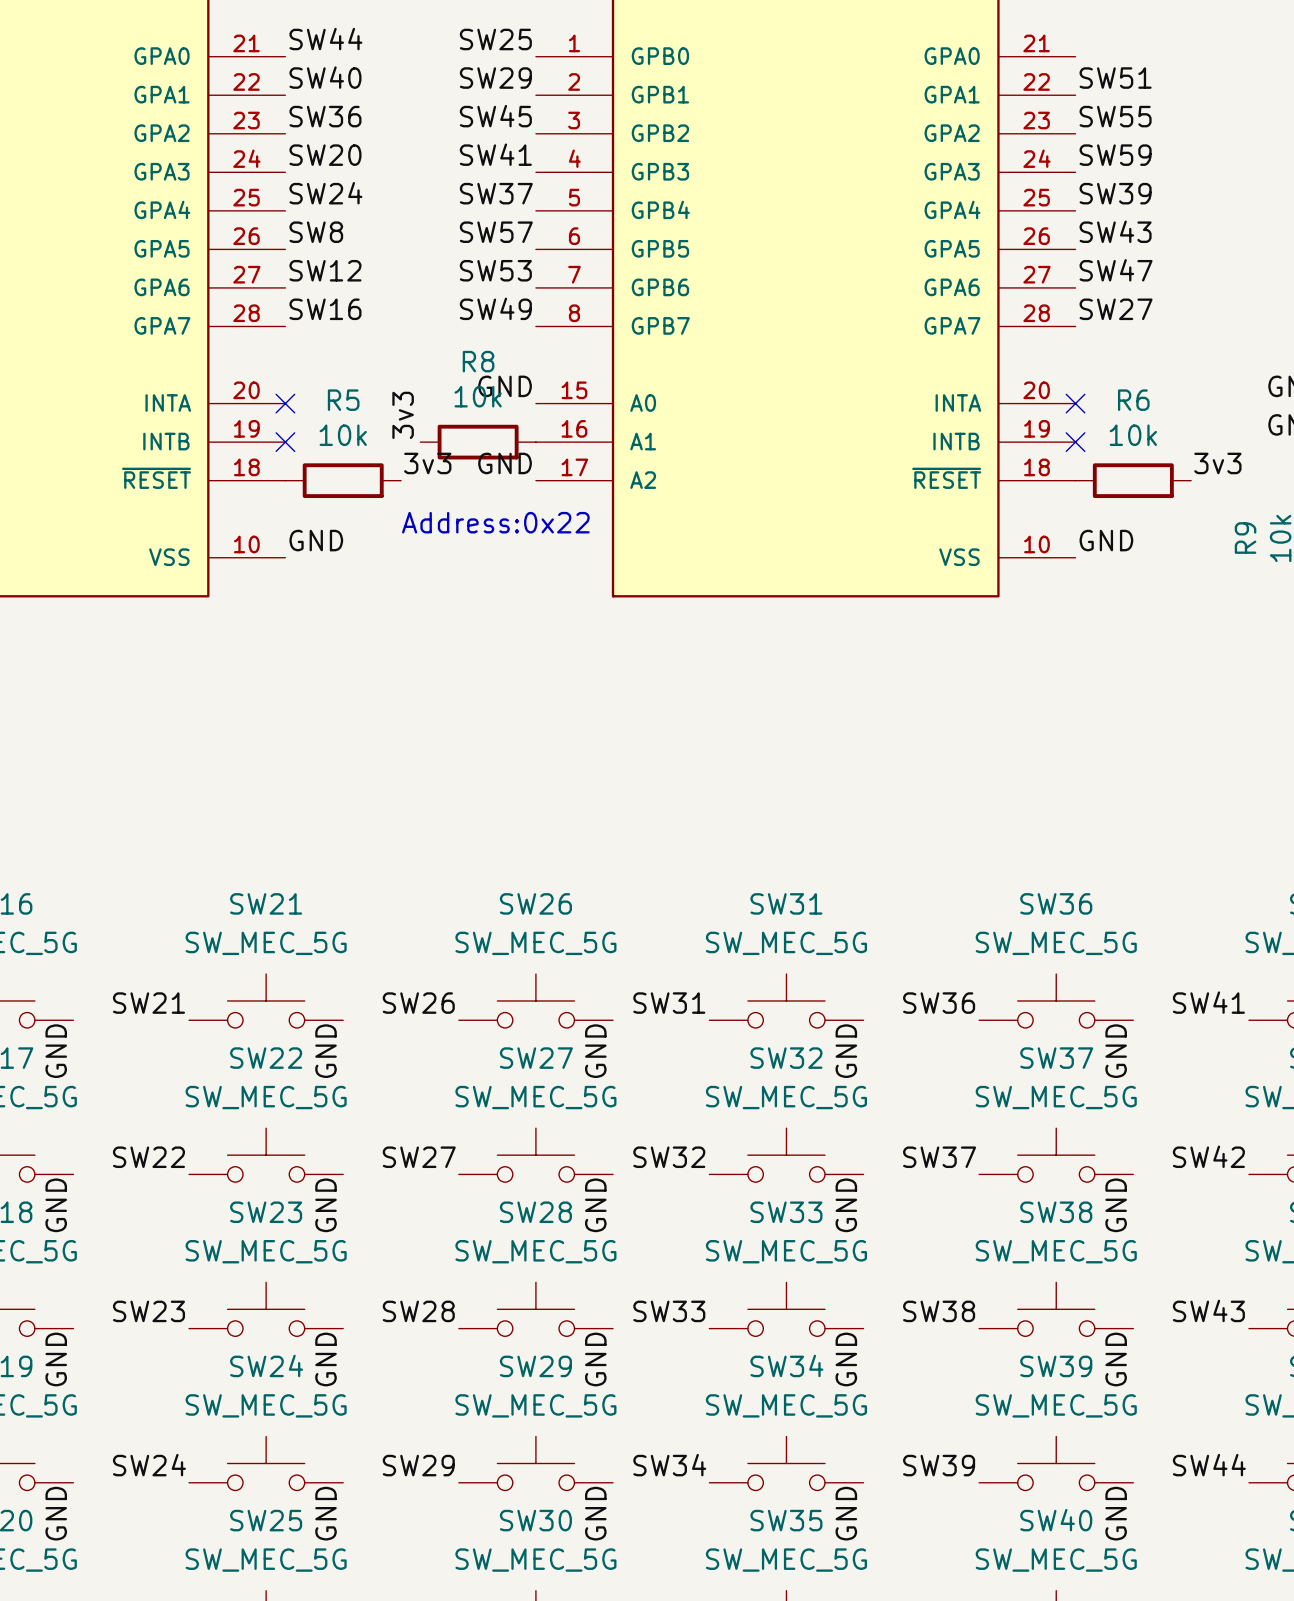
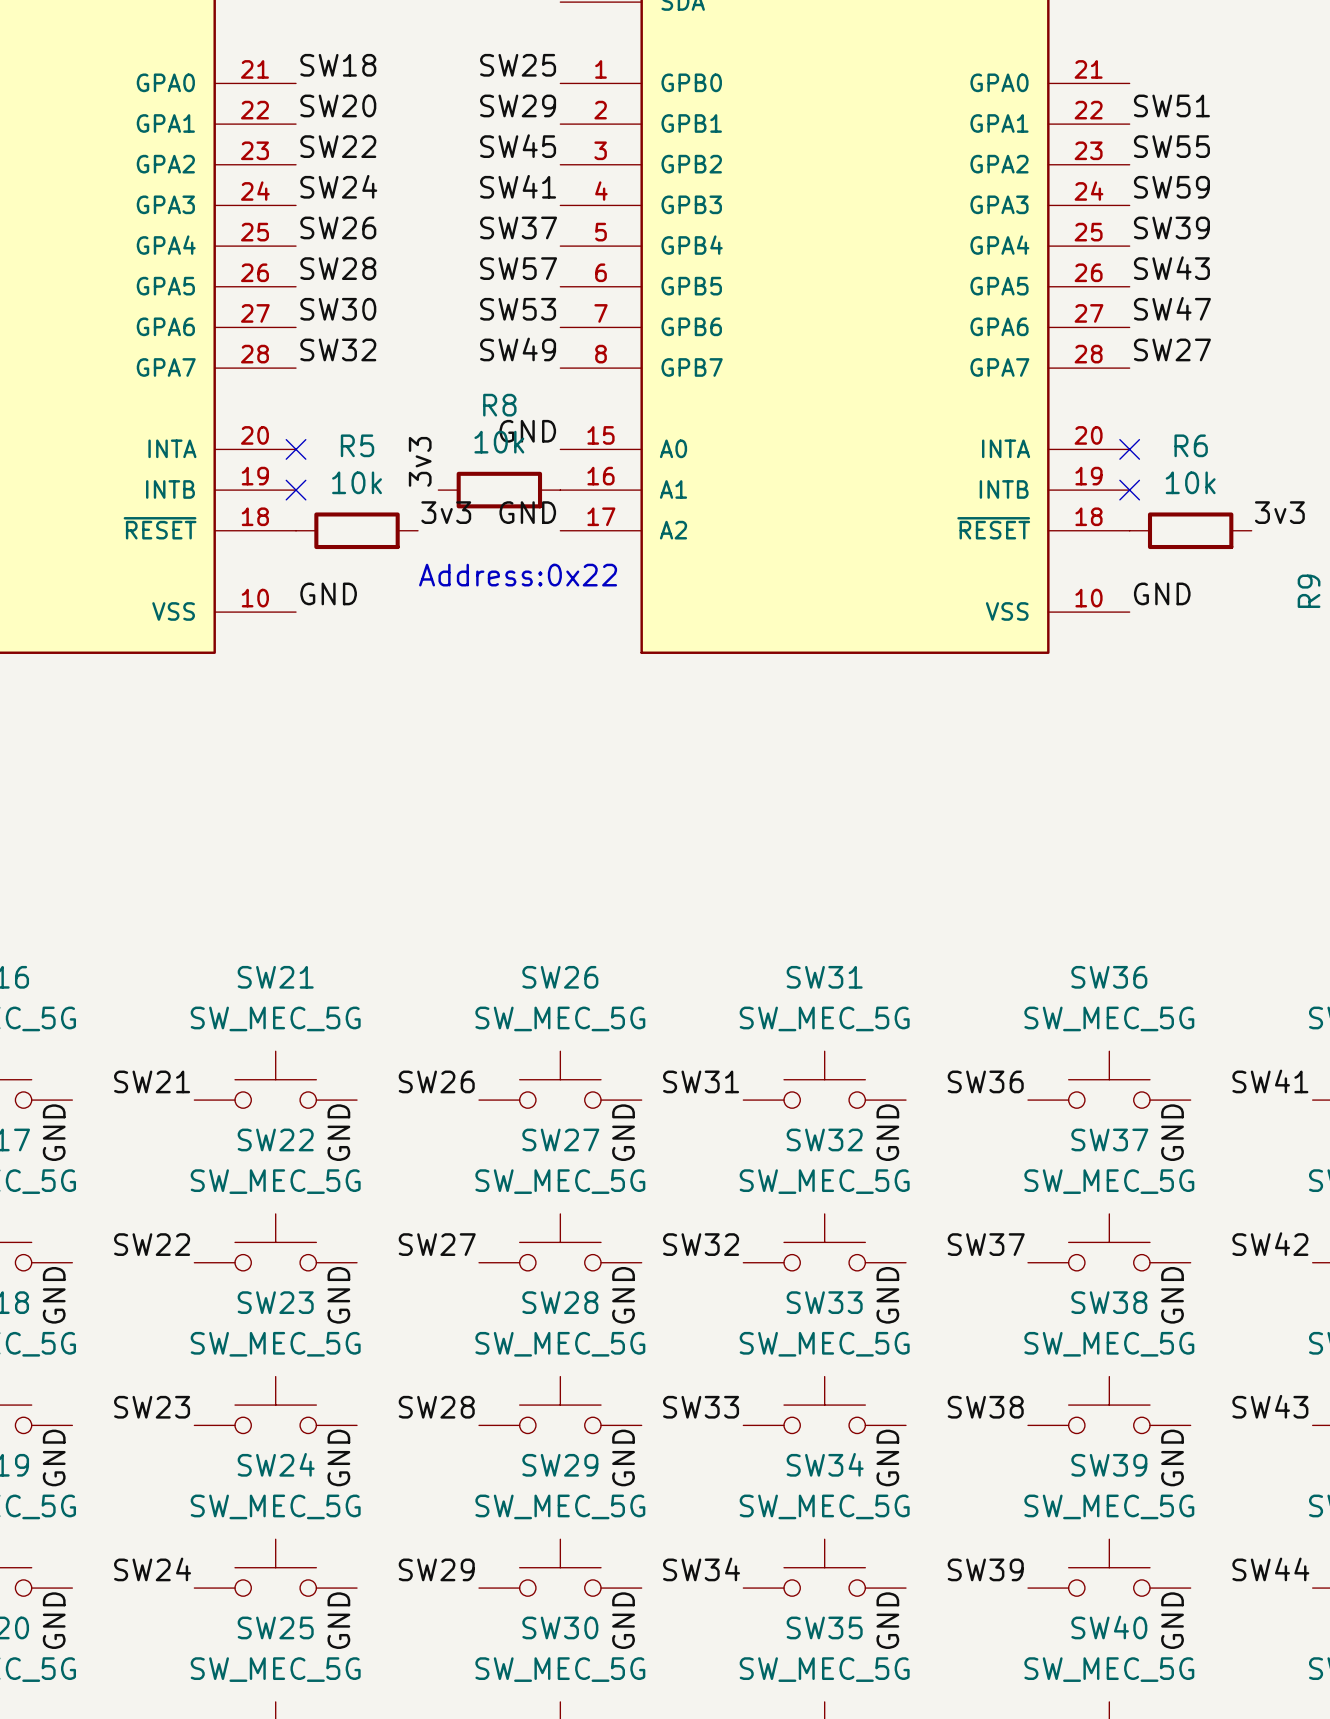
label: SW44 (325, 39) -> SW18 (338, 65)
label: SW40 (325, 77) -> SW20 (338, 105)
label: SW36 (325, 116) -> SW22 (338, 146)
label: SW20 (325, 155) -> SW24 (338, 186)
label: SW24 (325, 193) -> SW26 (338, 227)
label: SW8 (316, 232) -> SW28 (338, 268)
label: SW12 (325, 270) -> SW30 (338, 309)
label: SW16 (325, 309) -> SW32 (338, 349)

